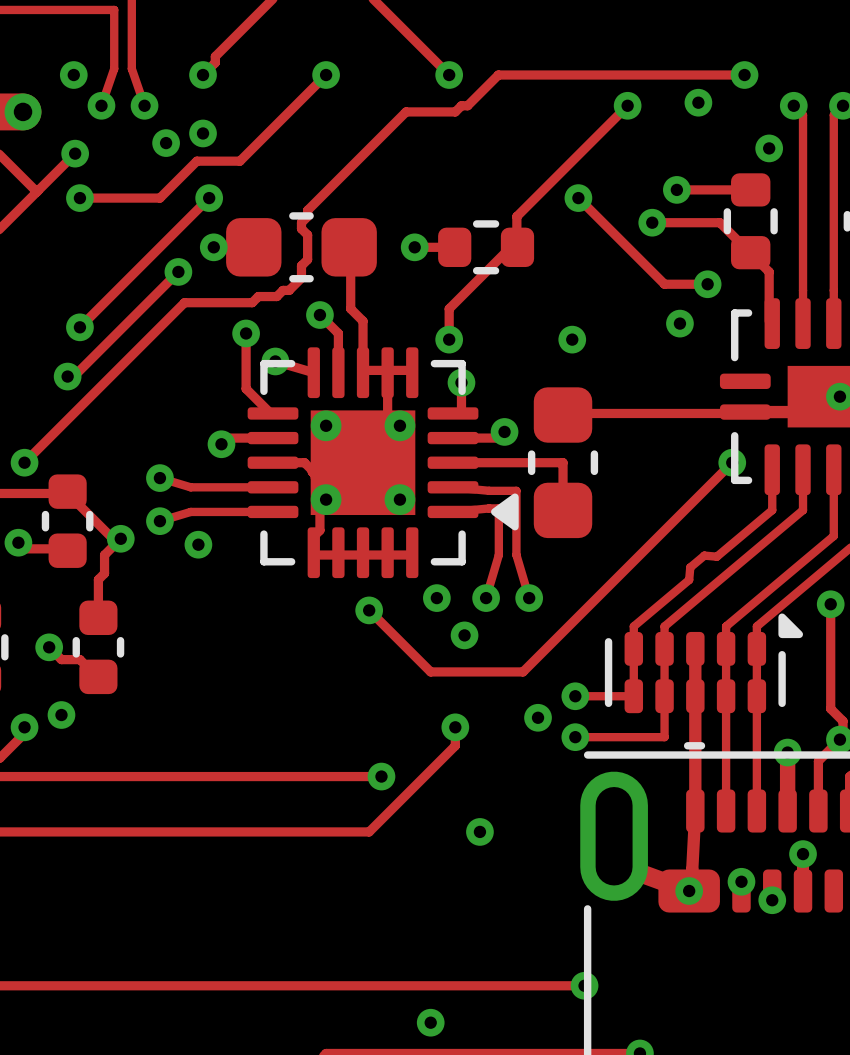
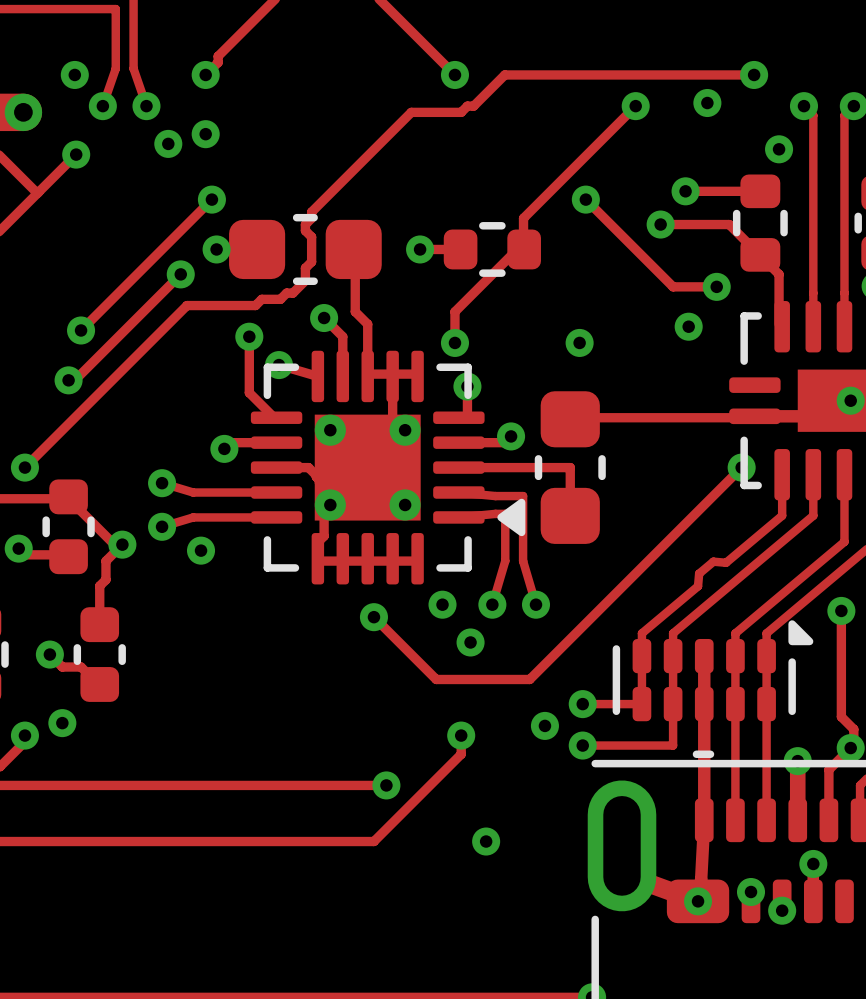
track: (326, 75) (239, 161) (196, 161) (159, 198) (79, 198) -> none
via: (326, 75) -> none
via: (79, 198) -> none

